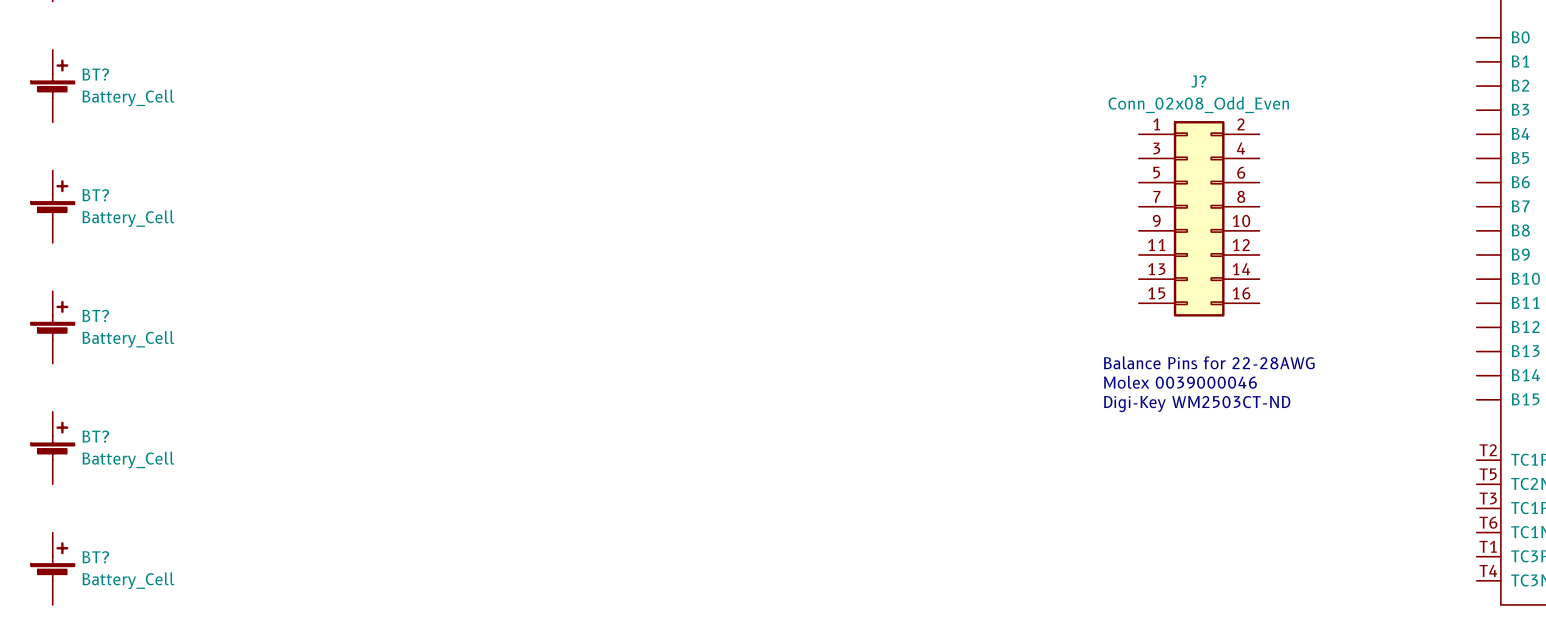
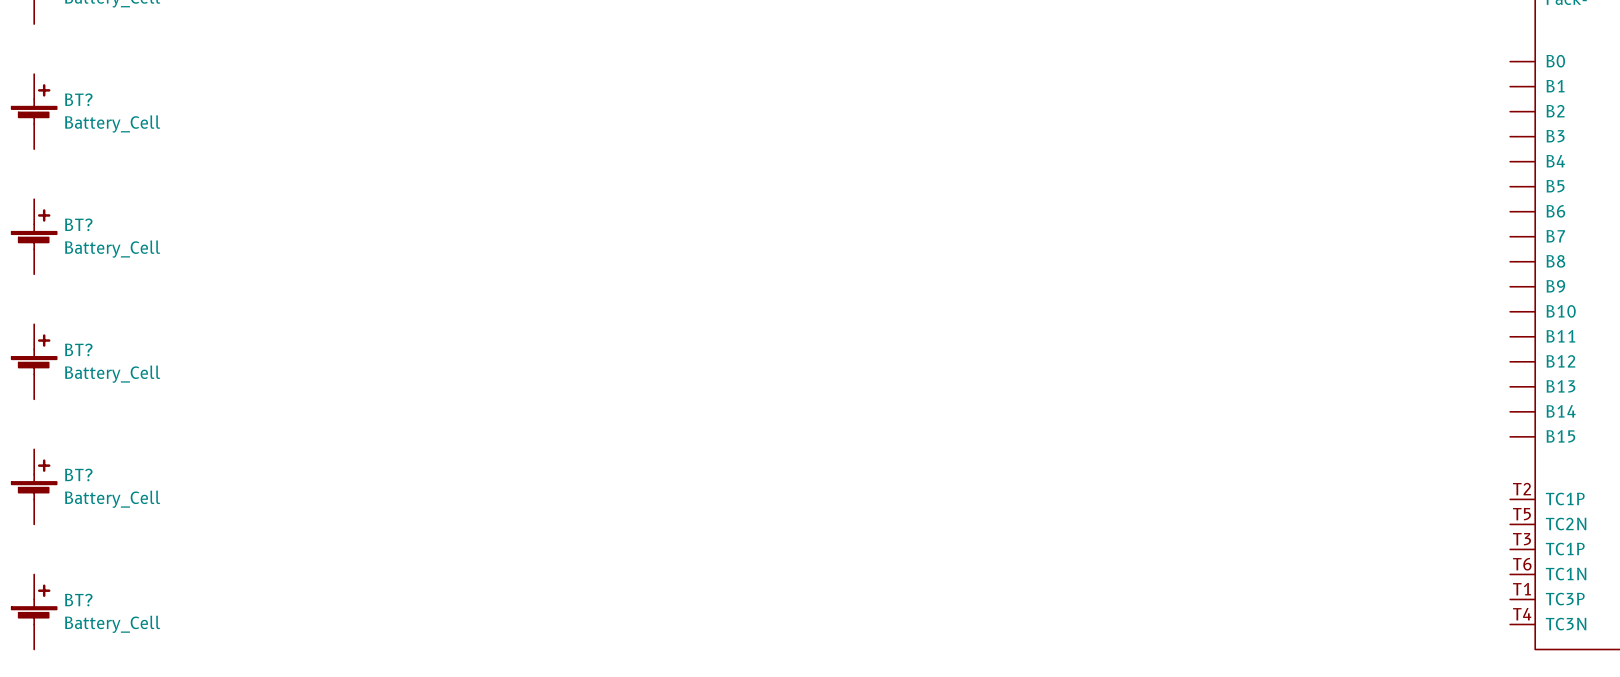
J?: Conn_02x08_Odd_Even (1199, 218) -> none
text: Balance Pins for 22-28AWG (1209, 362) -> none
text: Molex 0039000046 (1180, 382) -> none
text: Digi-Key WM2503CT-ND (1197, 404) -> none

